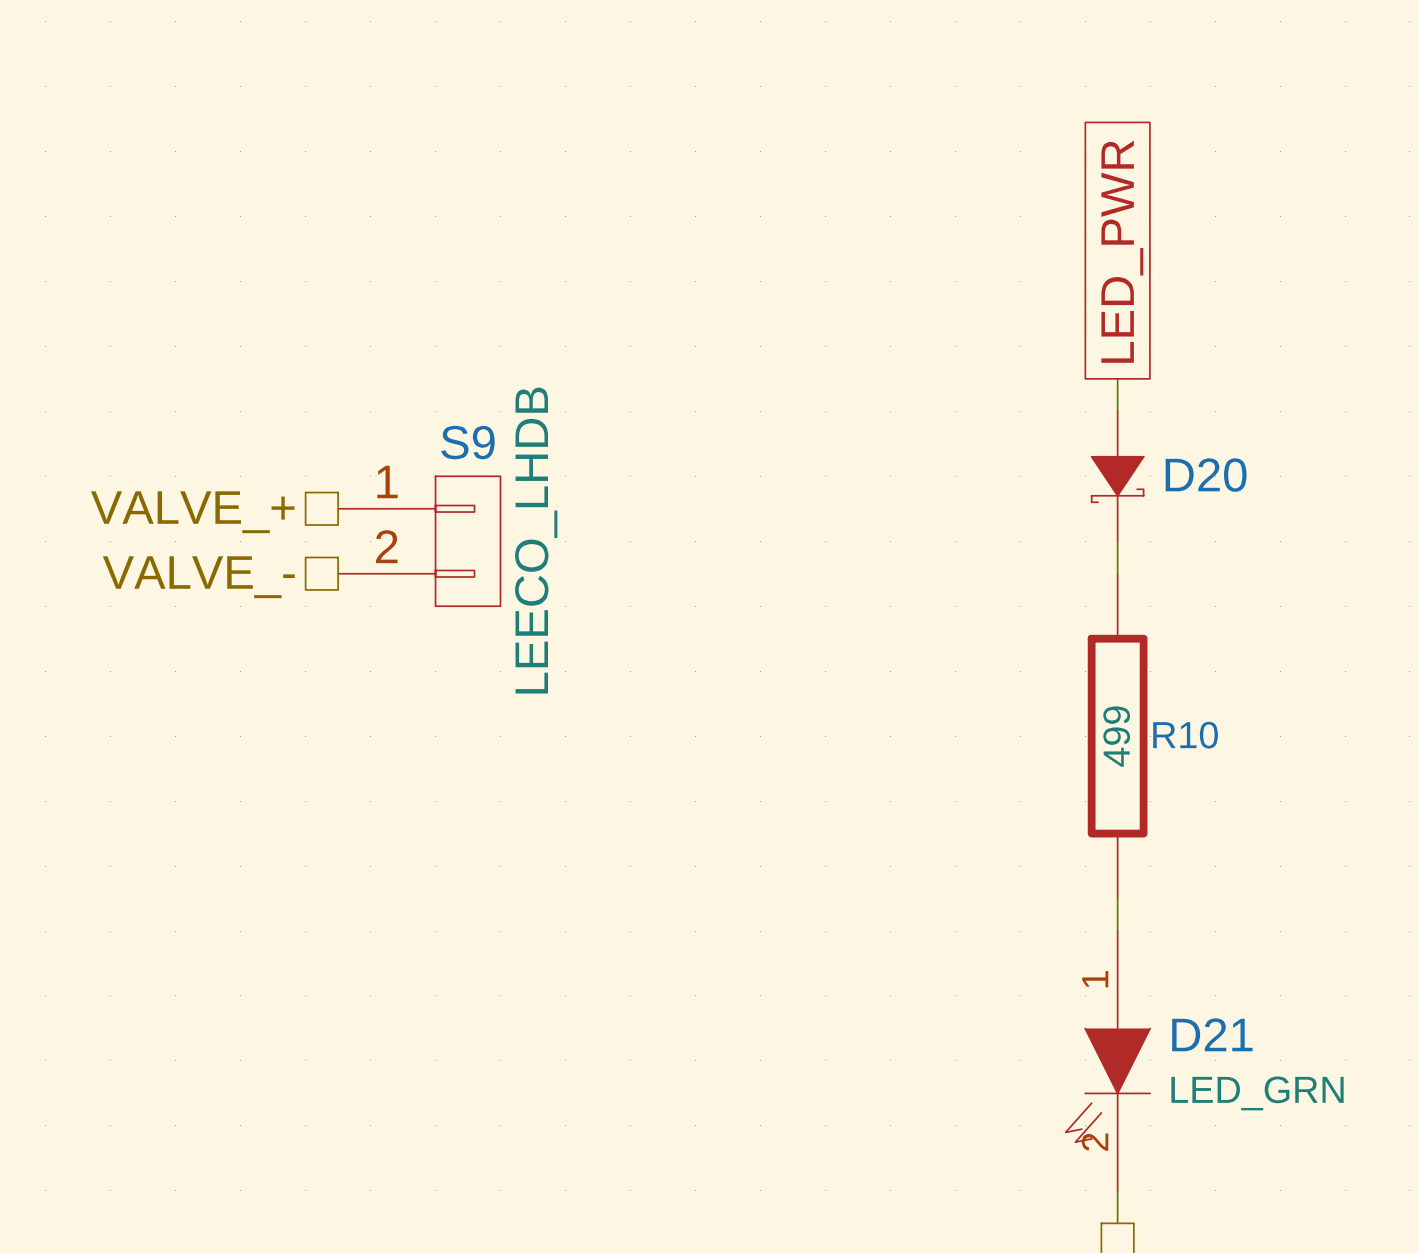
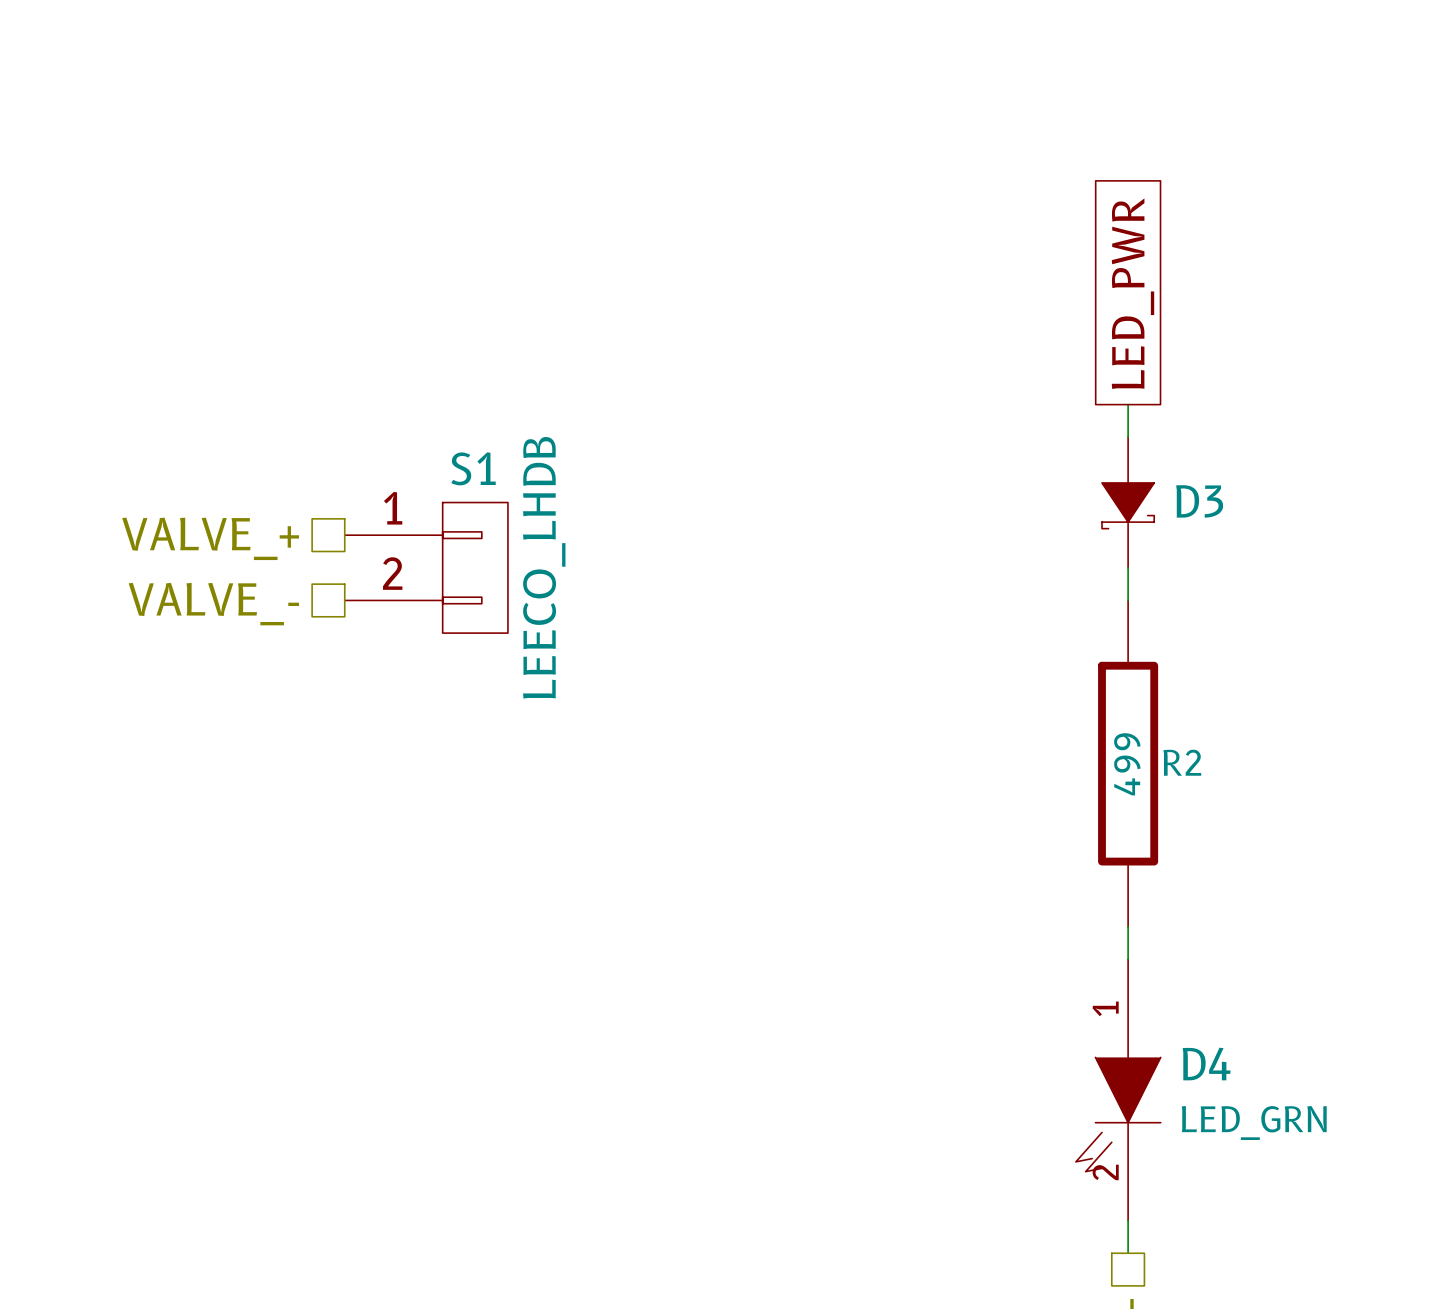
S9 name: S9 (467, 442) -> S1 (473, 468)
D20 name: D20 (1206, 475) -> D3 (1199, 501)
R10 name: R10 (1185, 735) -> R2 (1182, 762)
D21 name: D21 (1212, 1034) -> D4 (1206, 1064)

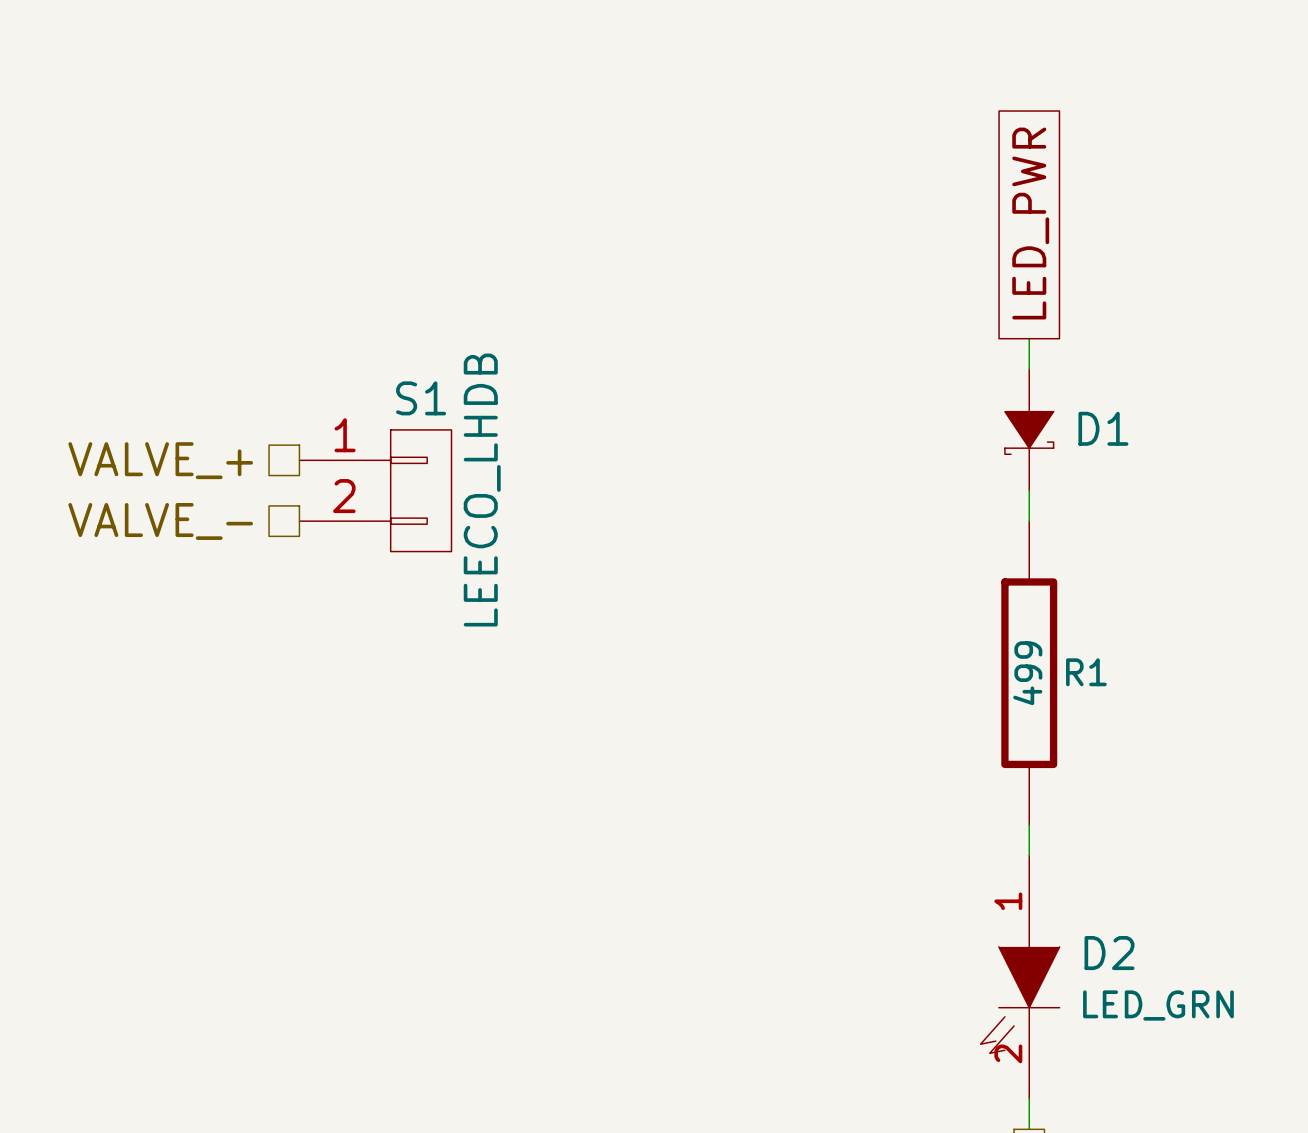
D3 name: D3 (1199, 501) -> D1 (1103, 428)
R2 name: R2 (1182, 762) -> R1 (1086, 672)
D4 name: D4 (1206, 1064) -> D2 (1109, 953)

